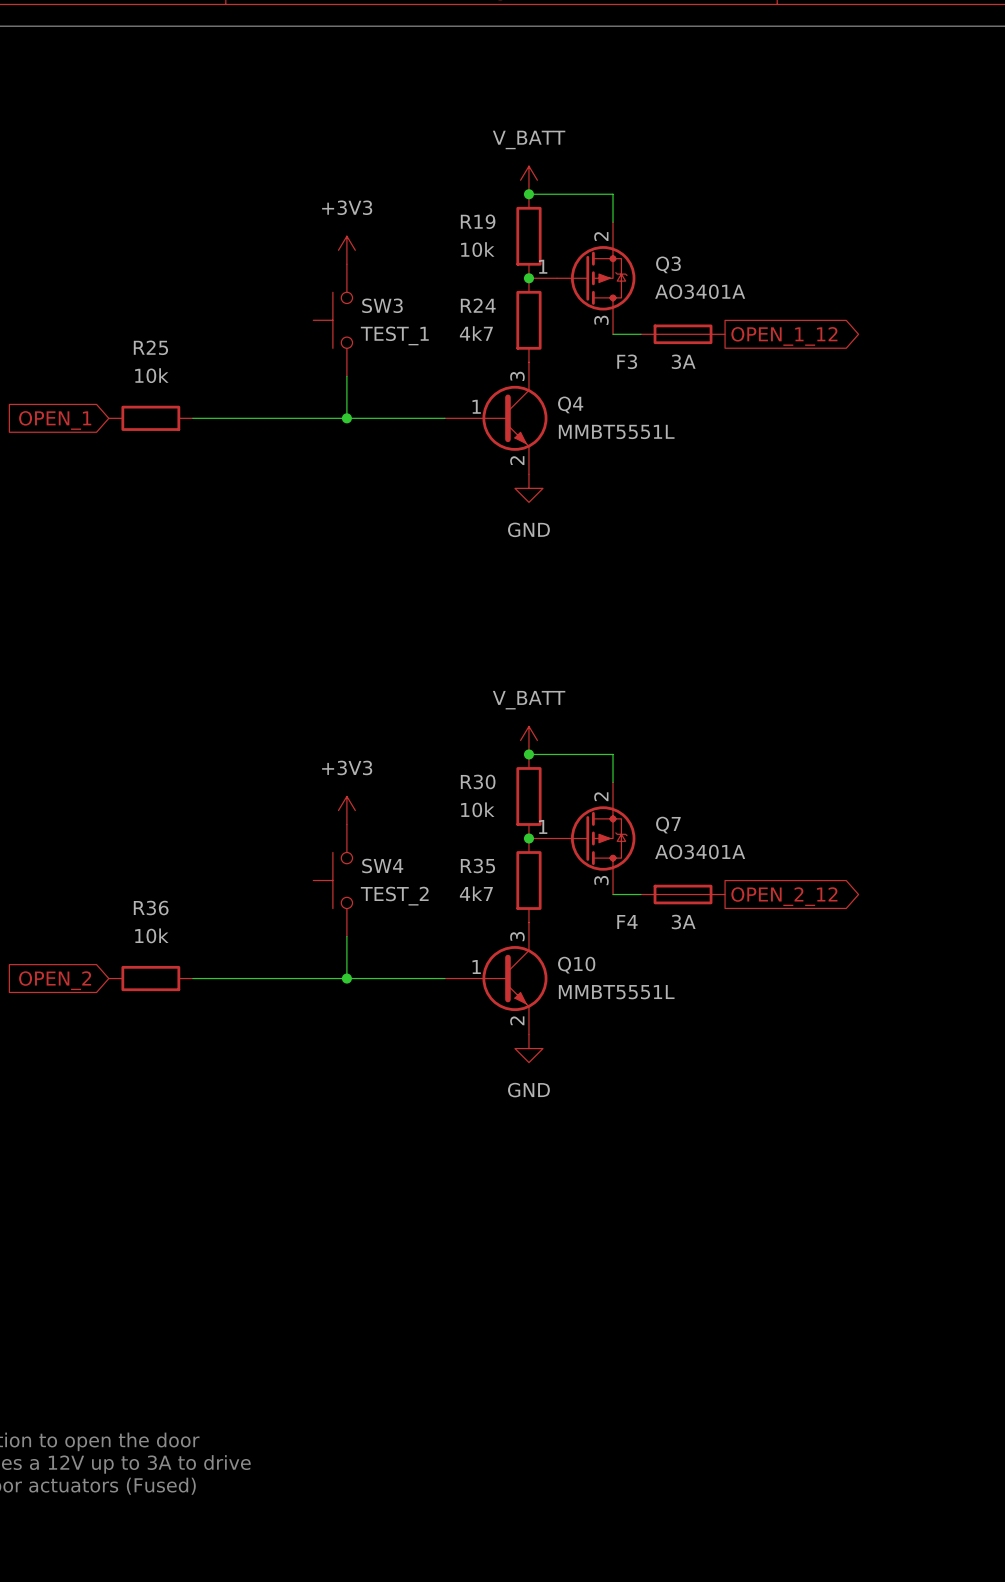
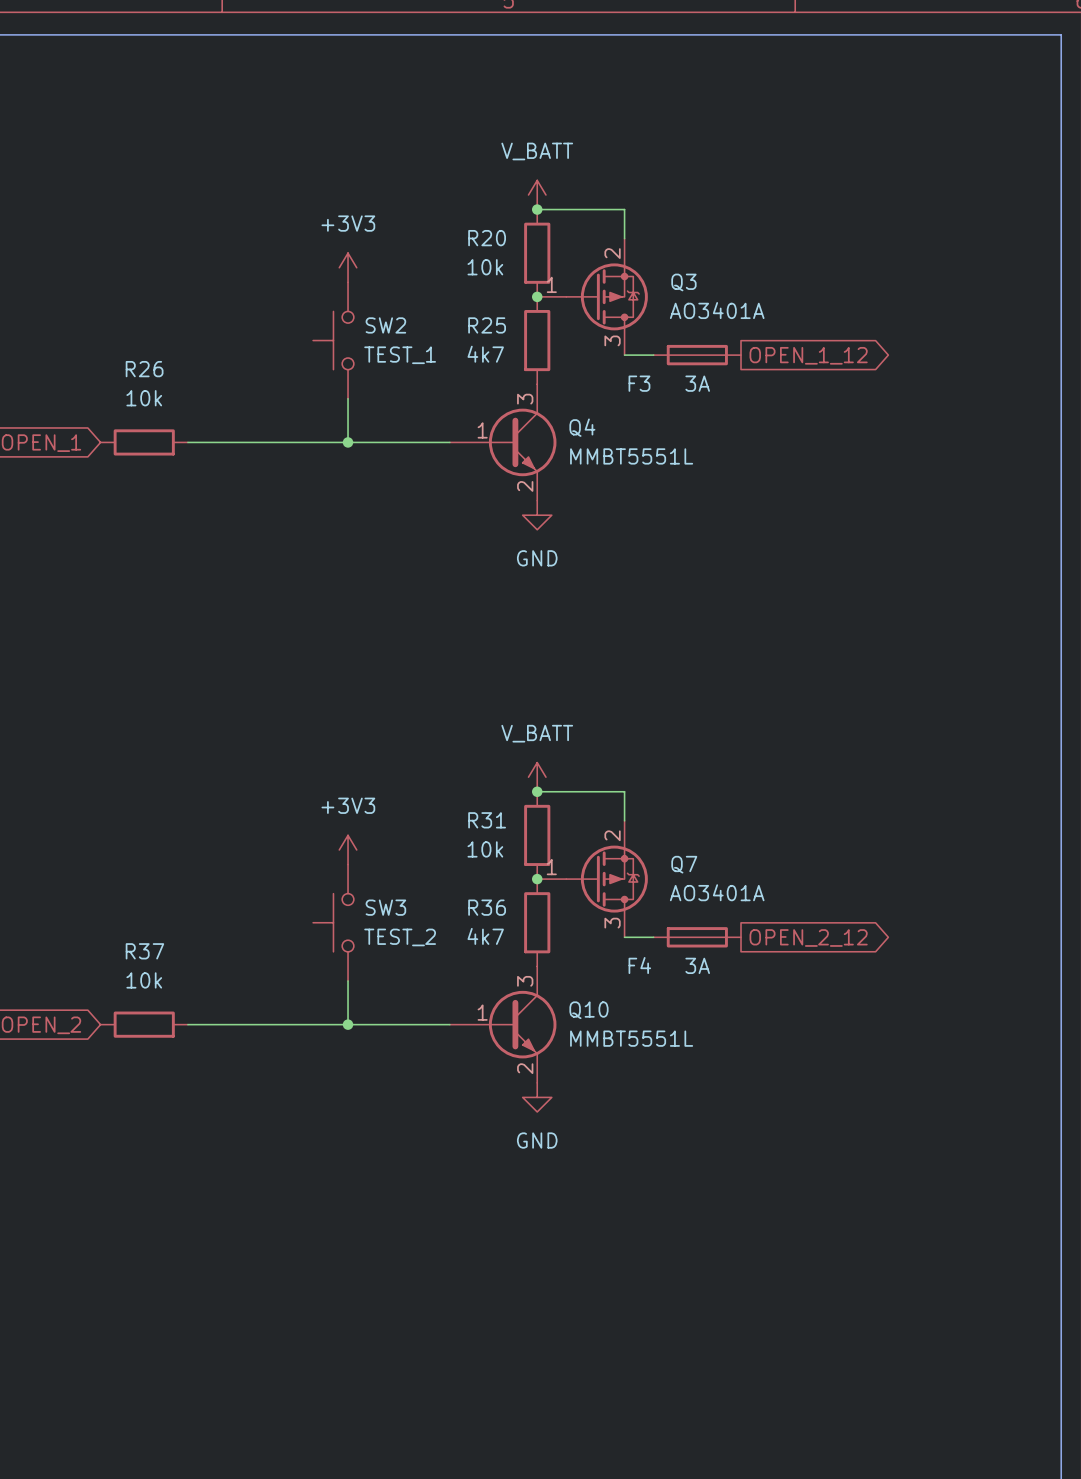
R19 name: R19 (478, 221) -> R20 (487, 238)
SW3 name: SW3 (382, 305) -> SW2 (385, 325)
R24 name: R24 (478, 305) -> R25 (487, 325)
R25 name: R25 (150, 347) -> R26 (144, 369)
R30 name: R30 (478, 781) -> R31 (487, 820)
SW4 name: SW4 (382, 865) -> SW3 (385, 907)
R35 name: R35 (477, 865) -> R36 (487, 907)
R36 name: R36 (151, 908) -> R37 (144, 951)

